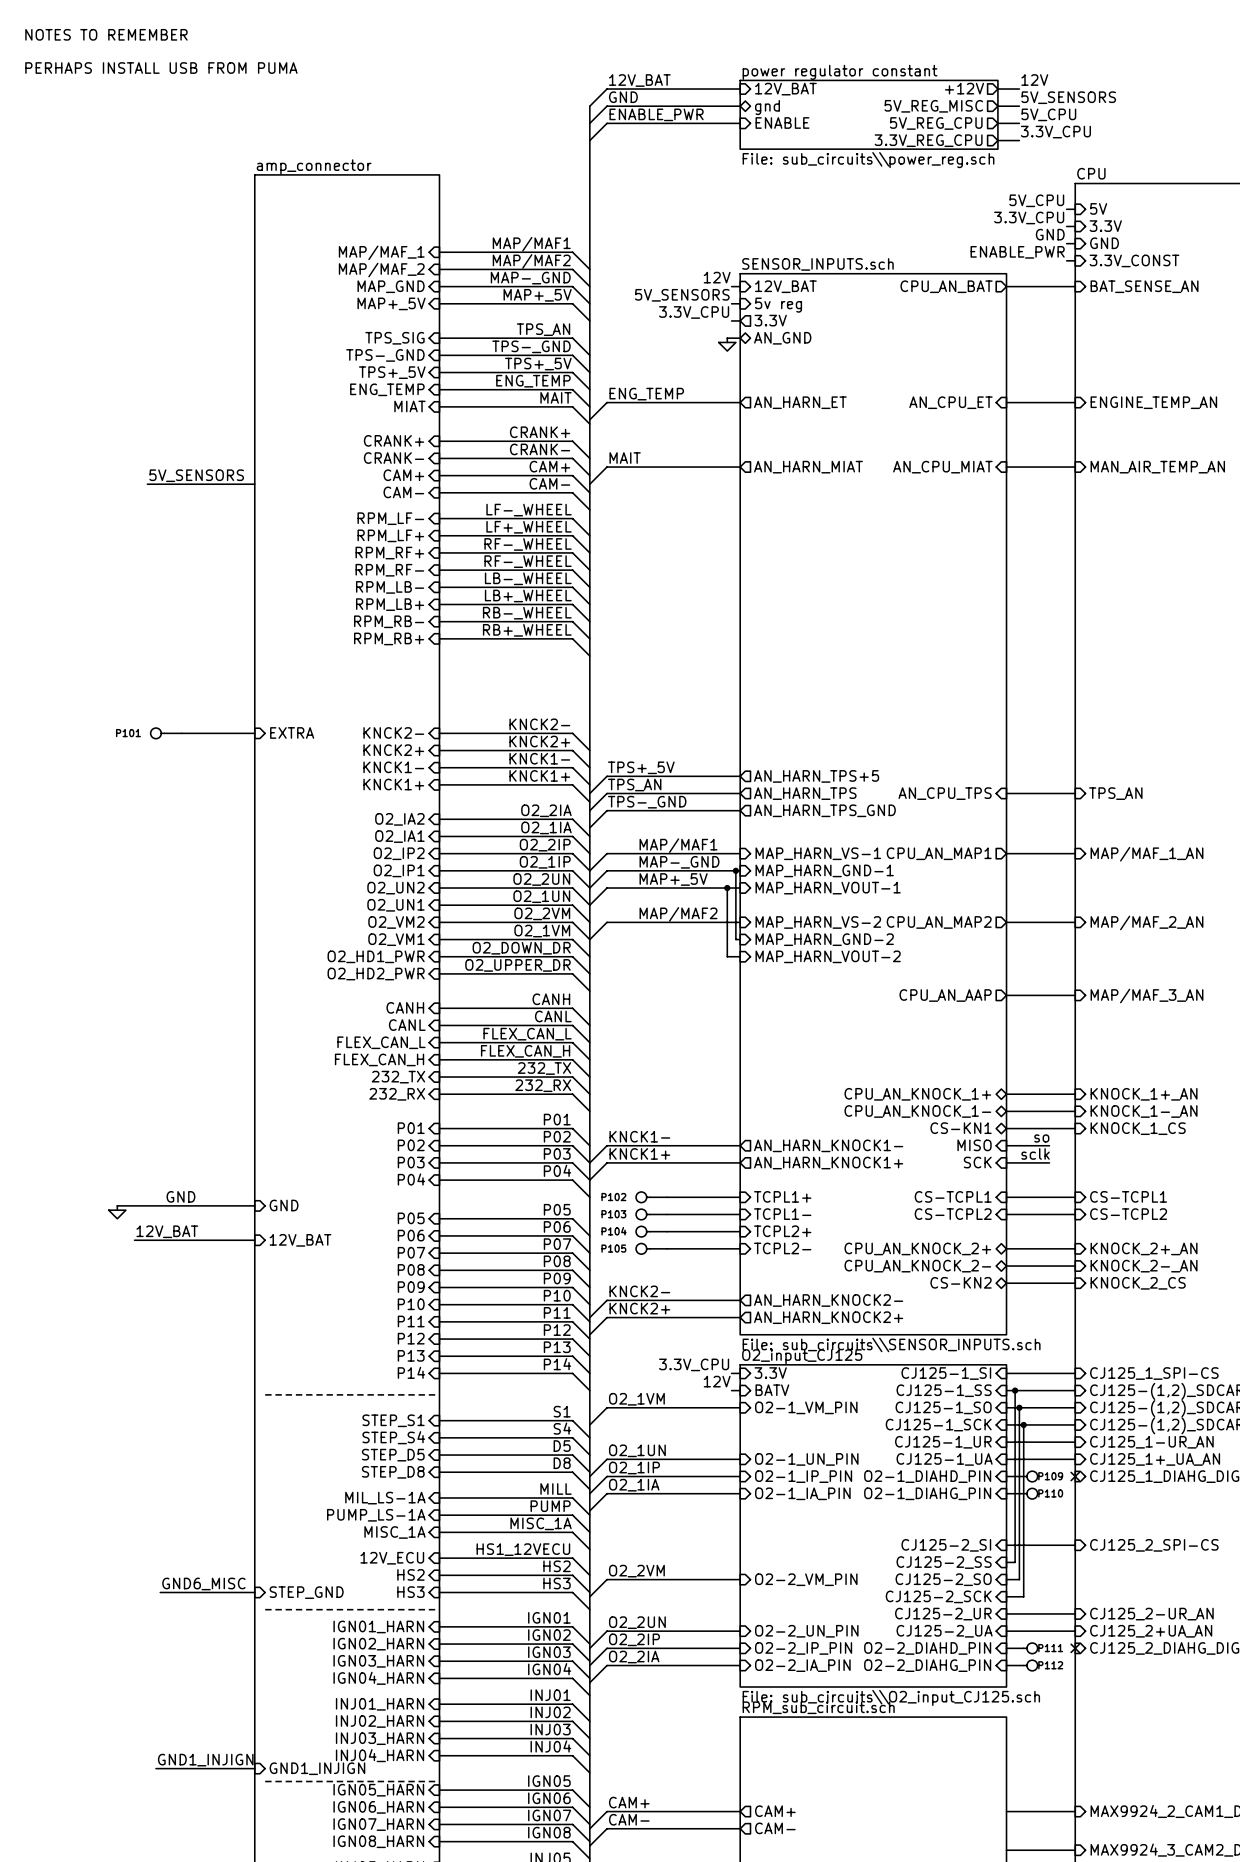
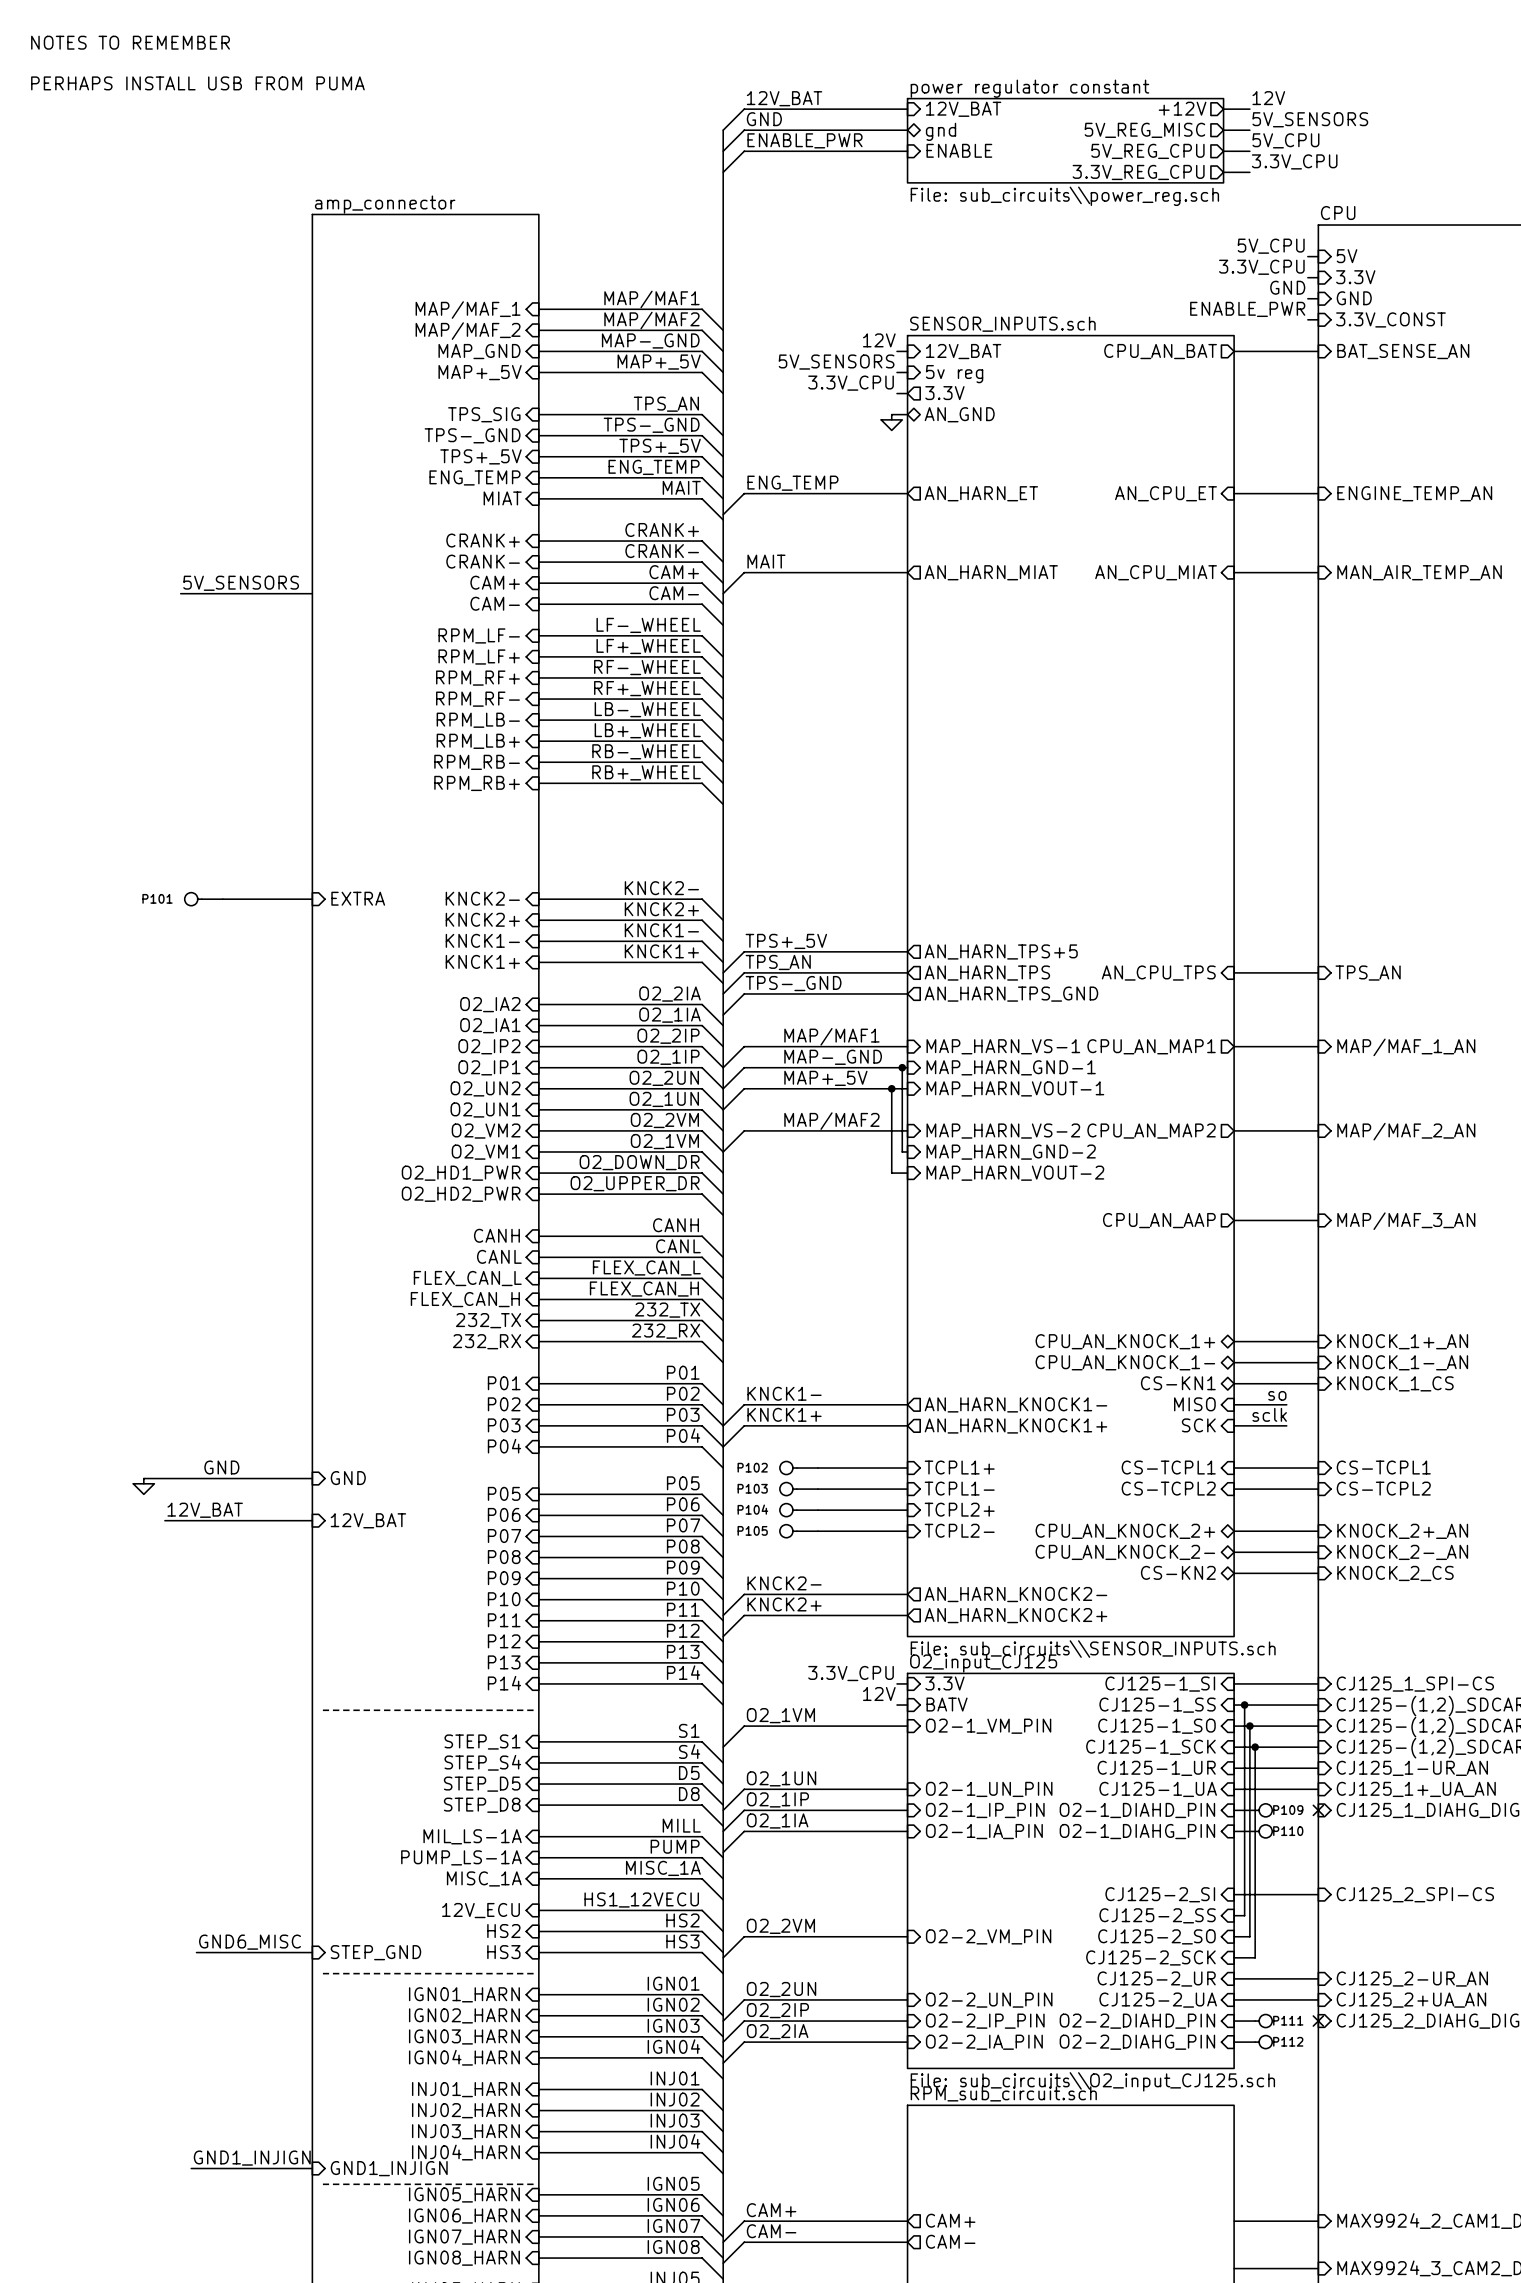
label: RF-_WHEEL (528, 561) -> RF+_WHEEL (647, 688)

